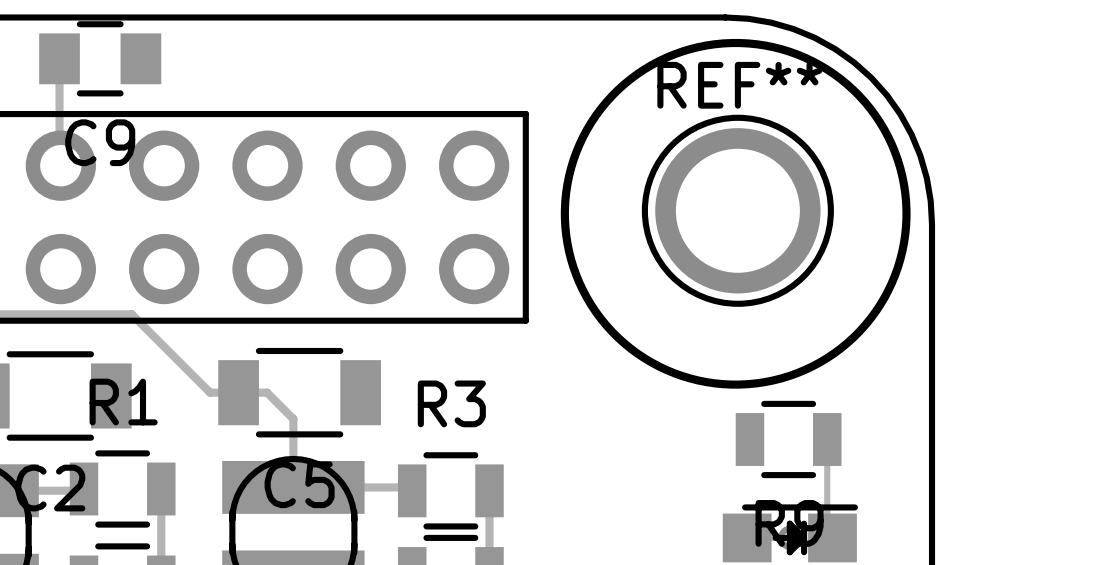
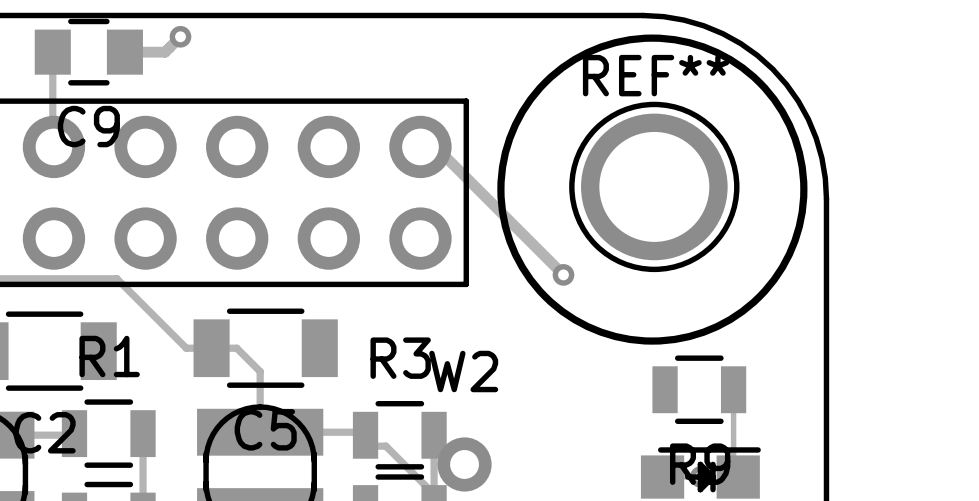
track: none -> (180, 36) (165, 52) (124, 52)
via: none -> (180, 36)
track: none -> (420, 146) (435, 146) (563, 274)
via: none -> (563, 274)
track: none -> (359, 446) (385, 446) (429, 489)
W2: none -> (464, 464)

